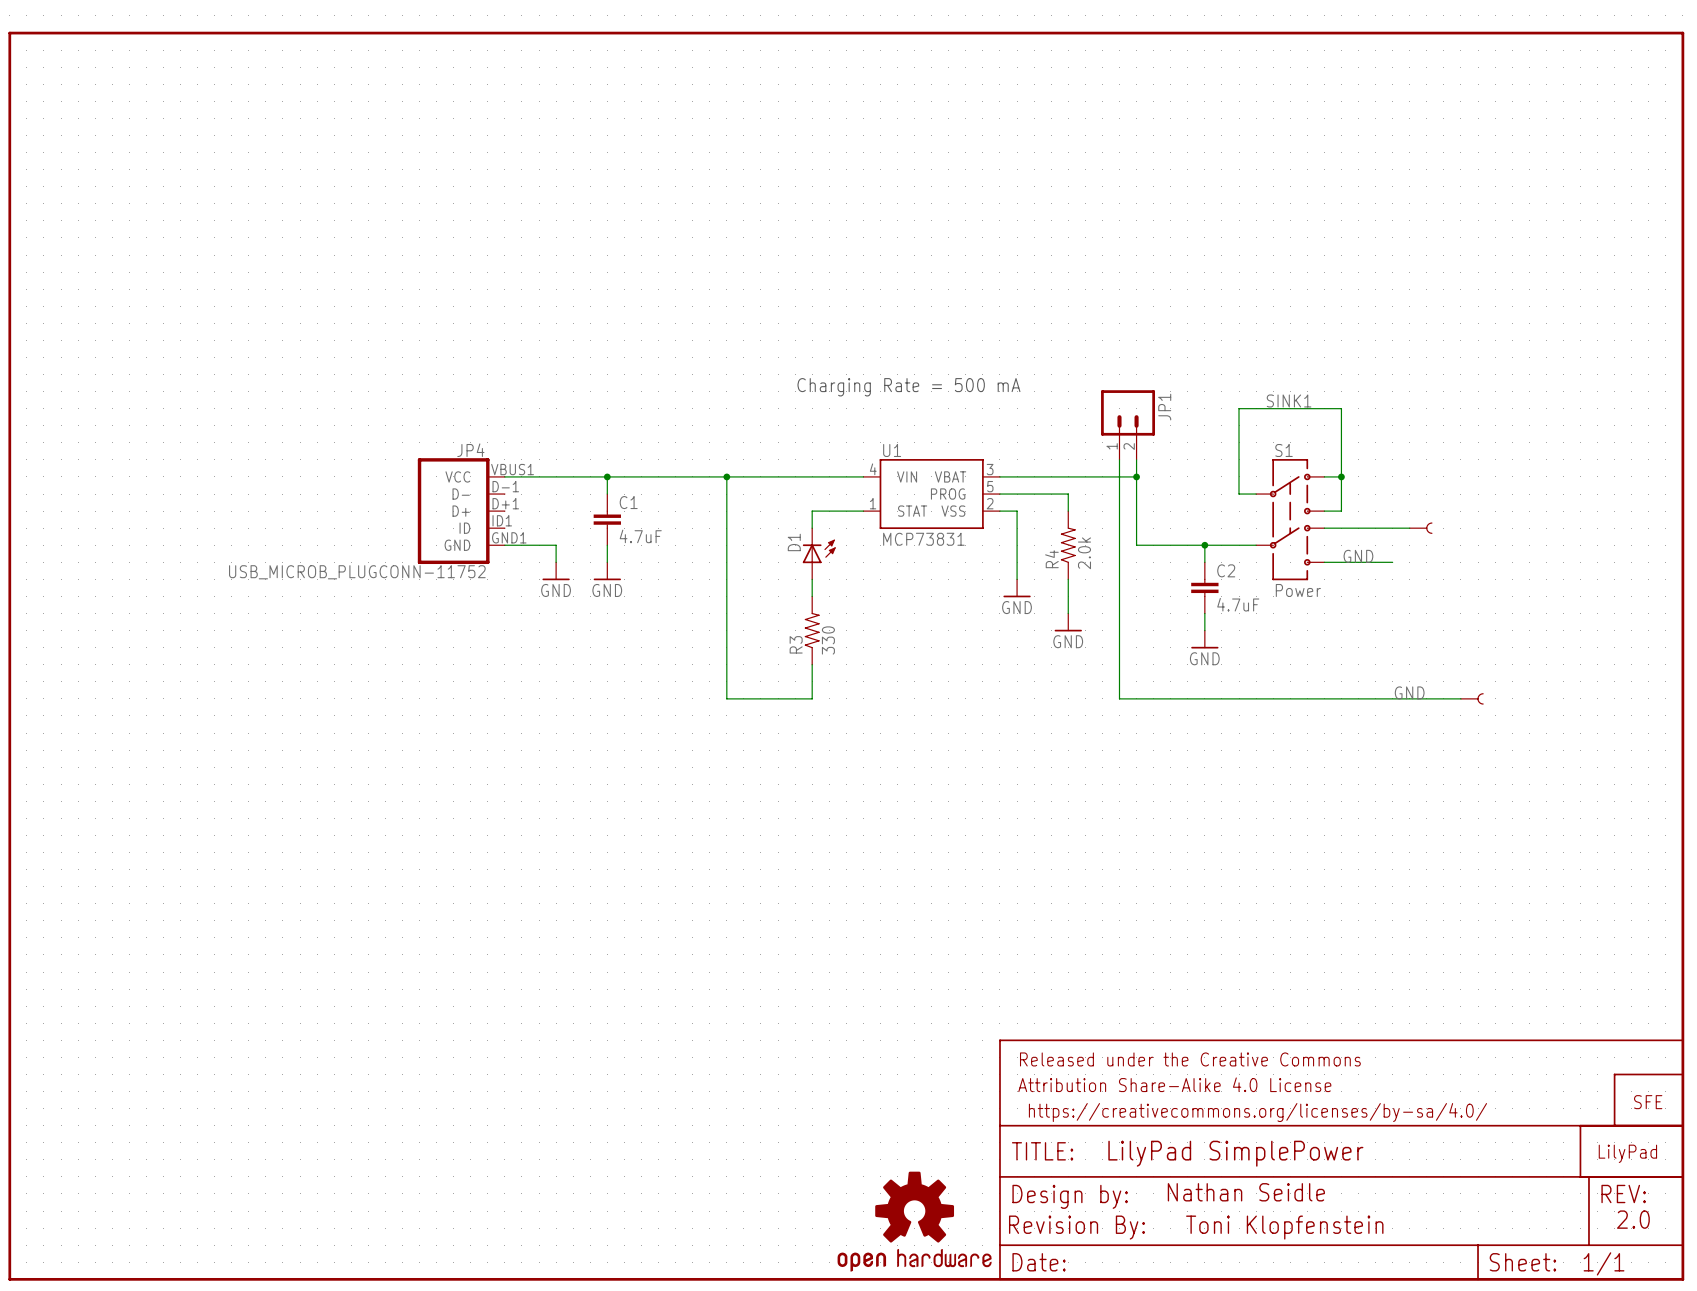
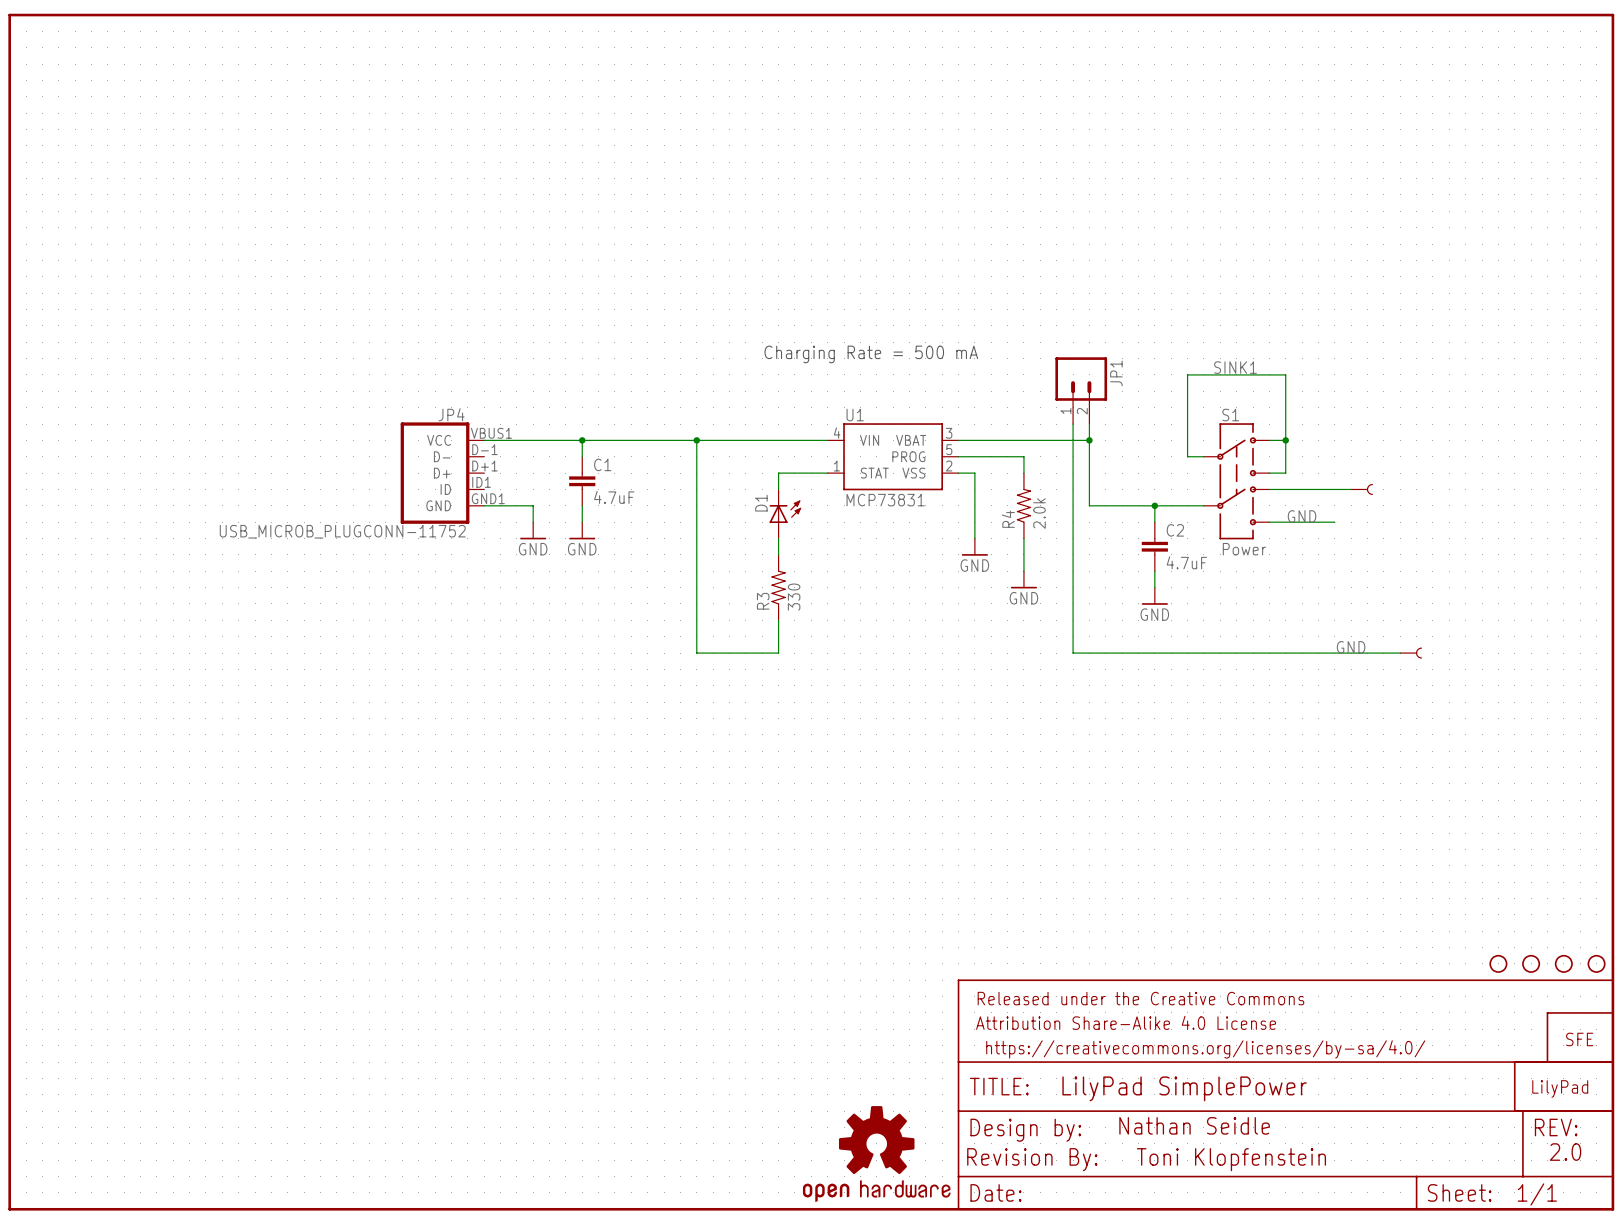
part: none -> (1498, 963)
part: none -> (1531, 963)
part: none -> (1563, 963)
part: none -> (1596, 963)

